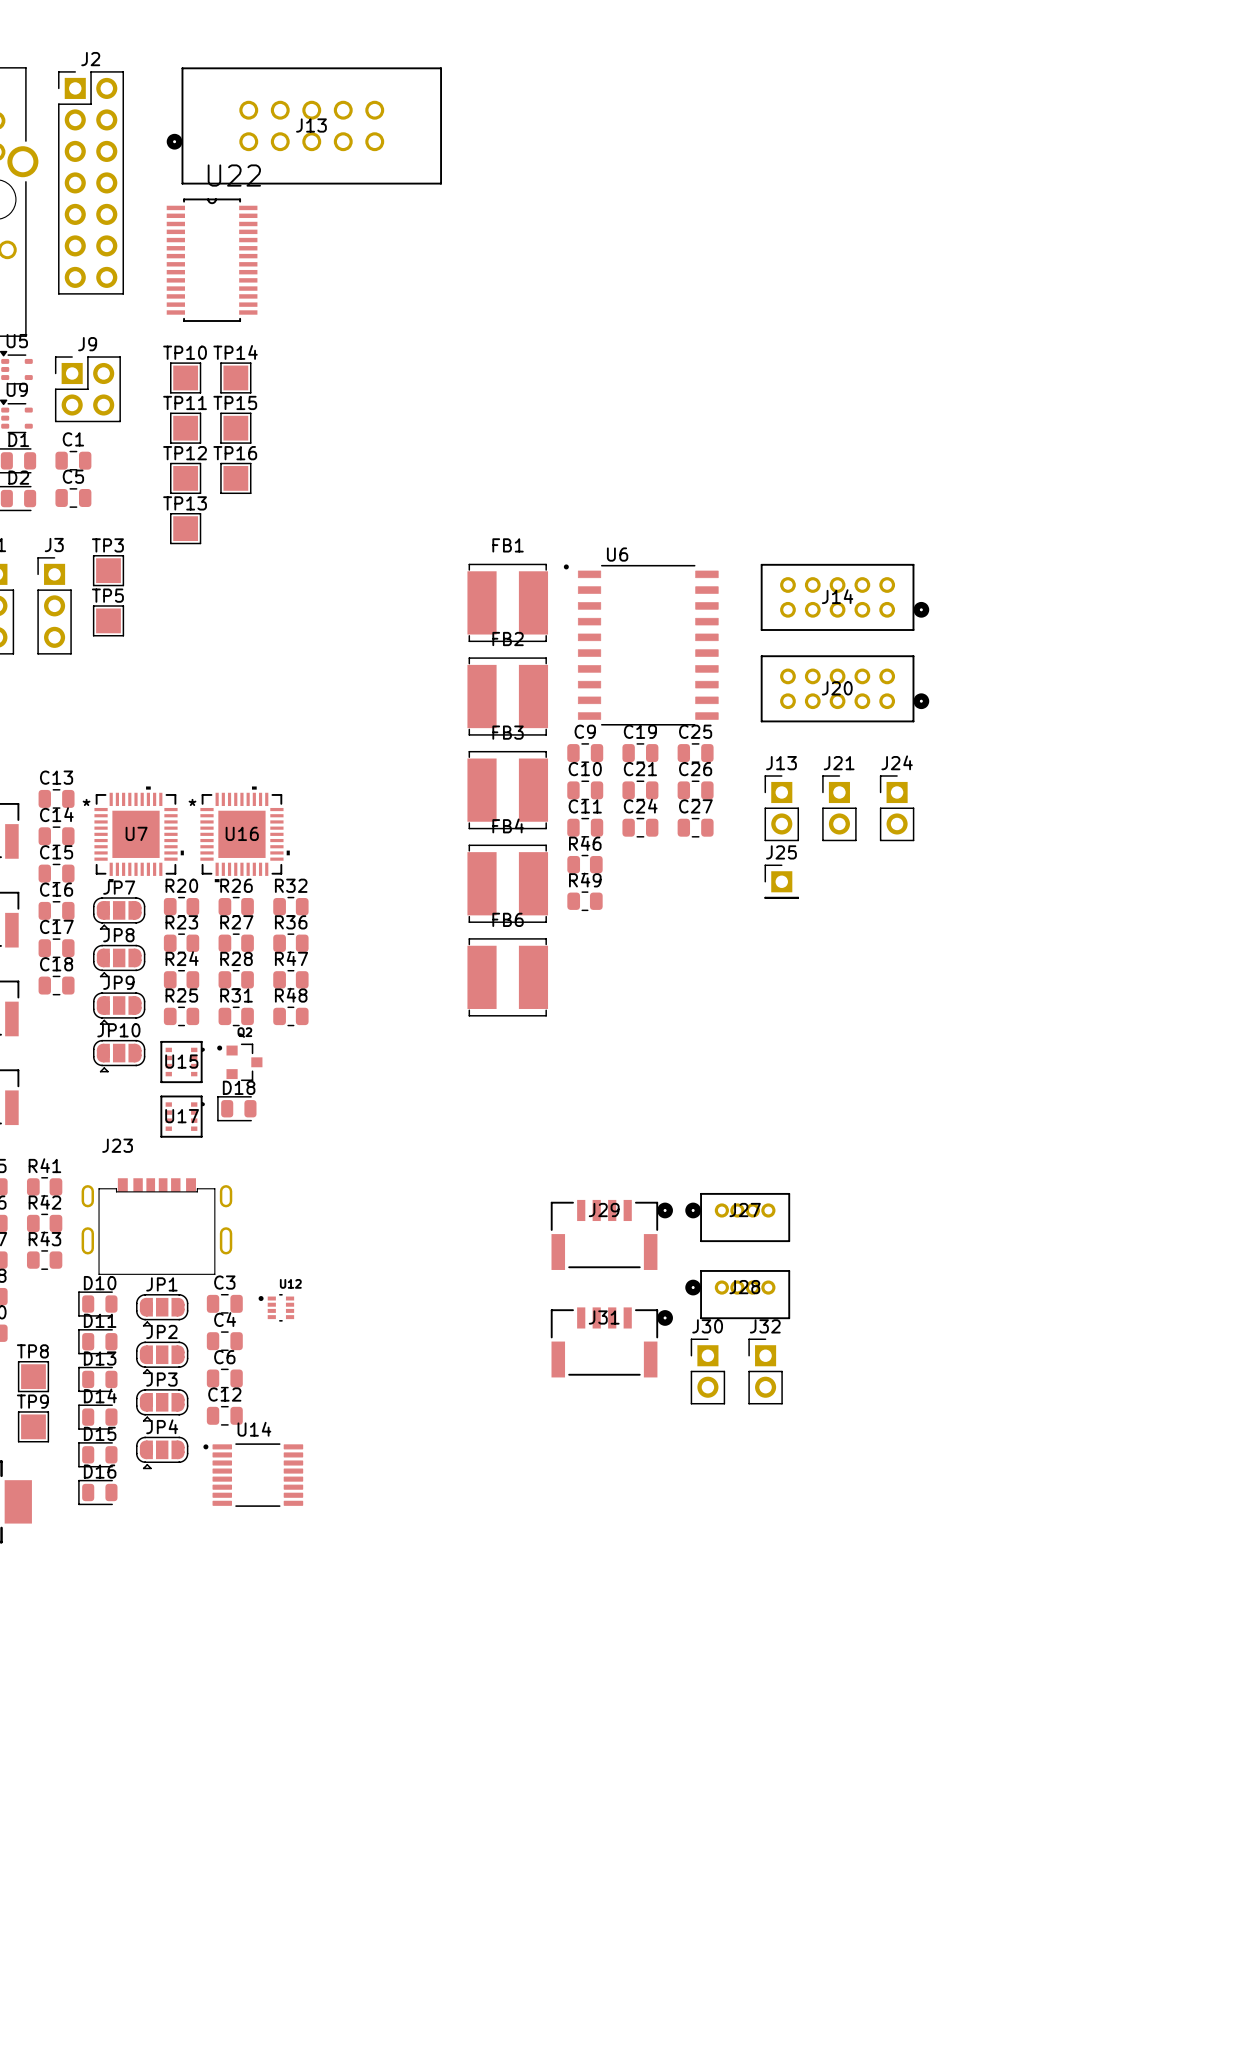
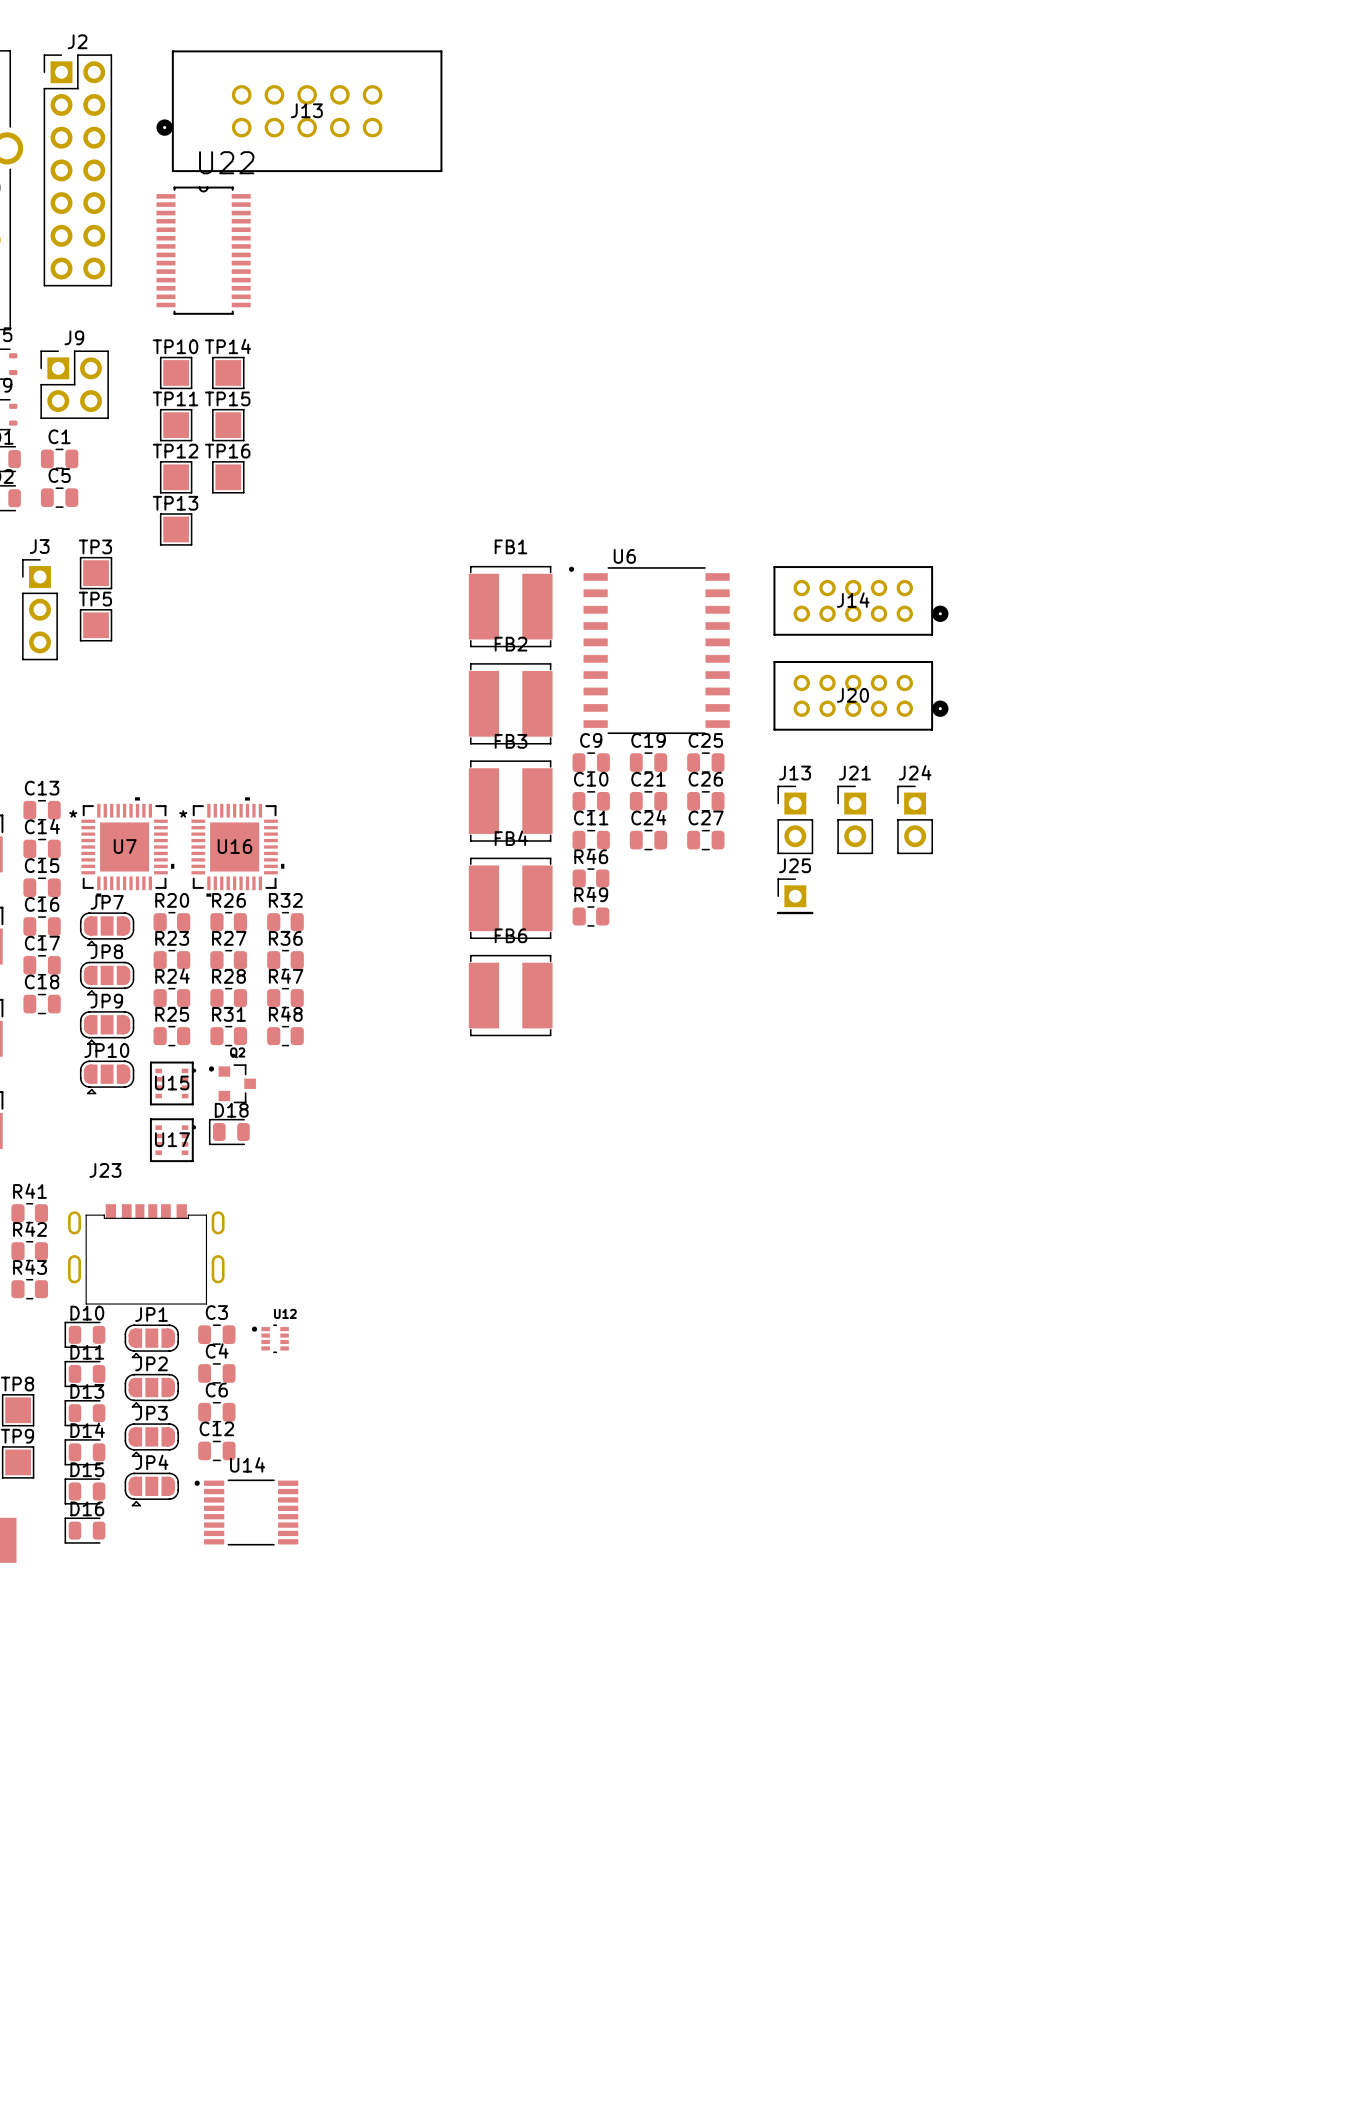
J27: (737, 1217) -> none
J29: (611, 1234) -> none
J28: (737, 1294) -> none
J31: (611, 1342) -> none
J30: (707, 1371) -> none
J32: (765, 1371) -> none

